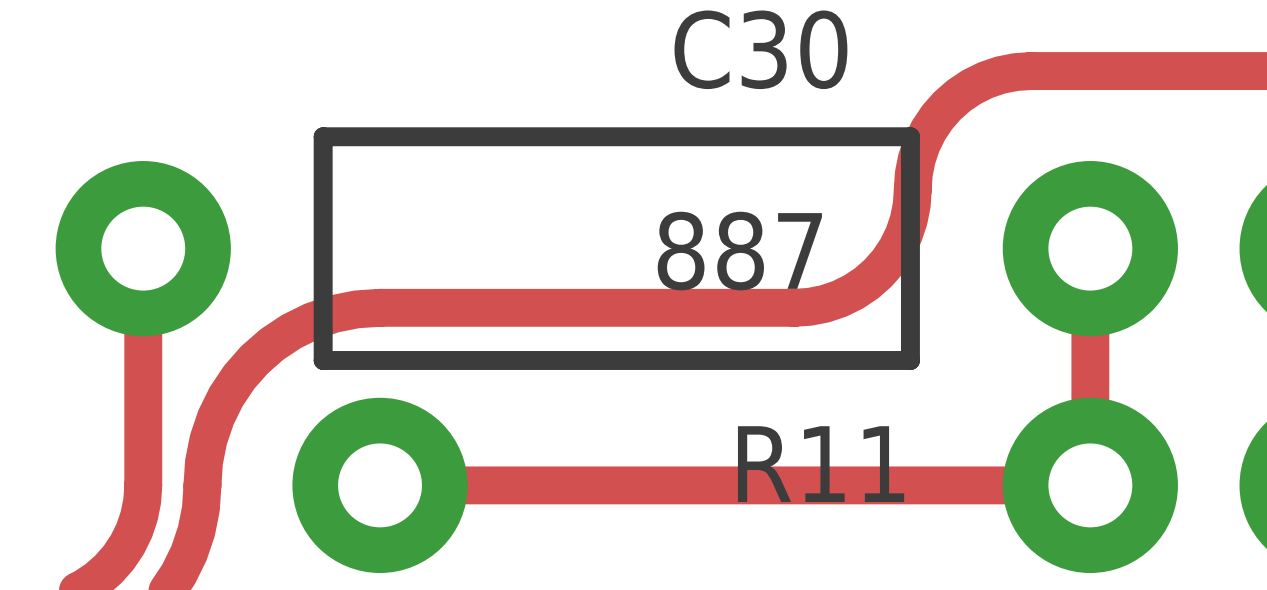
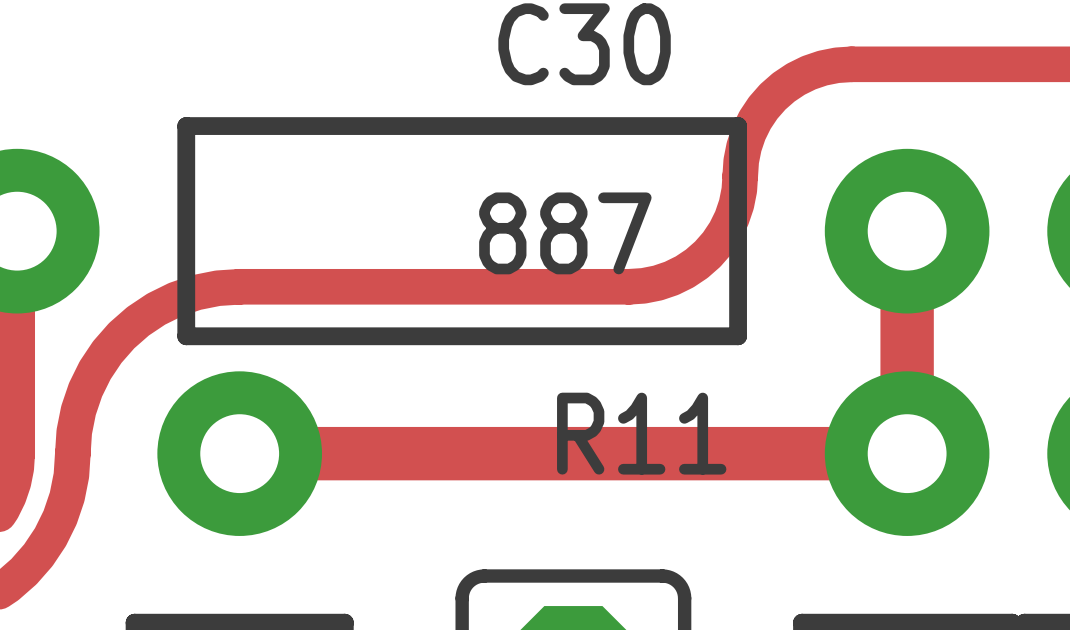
track width: thin (1090, 248) (1090, 485) (380, 485) -> thick (907, 231) (907, 453) (239, 453)

